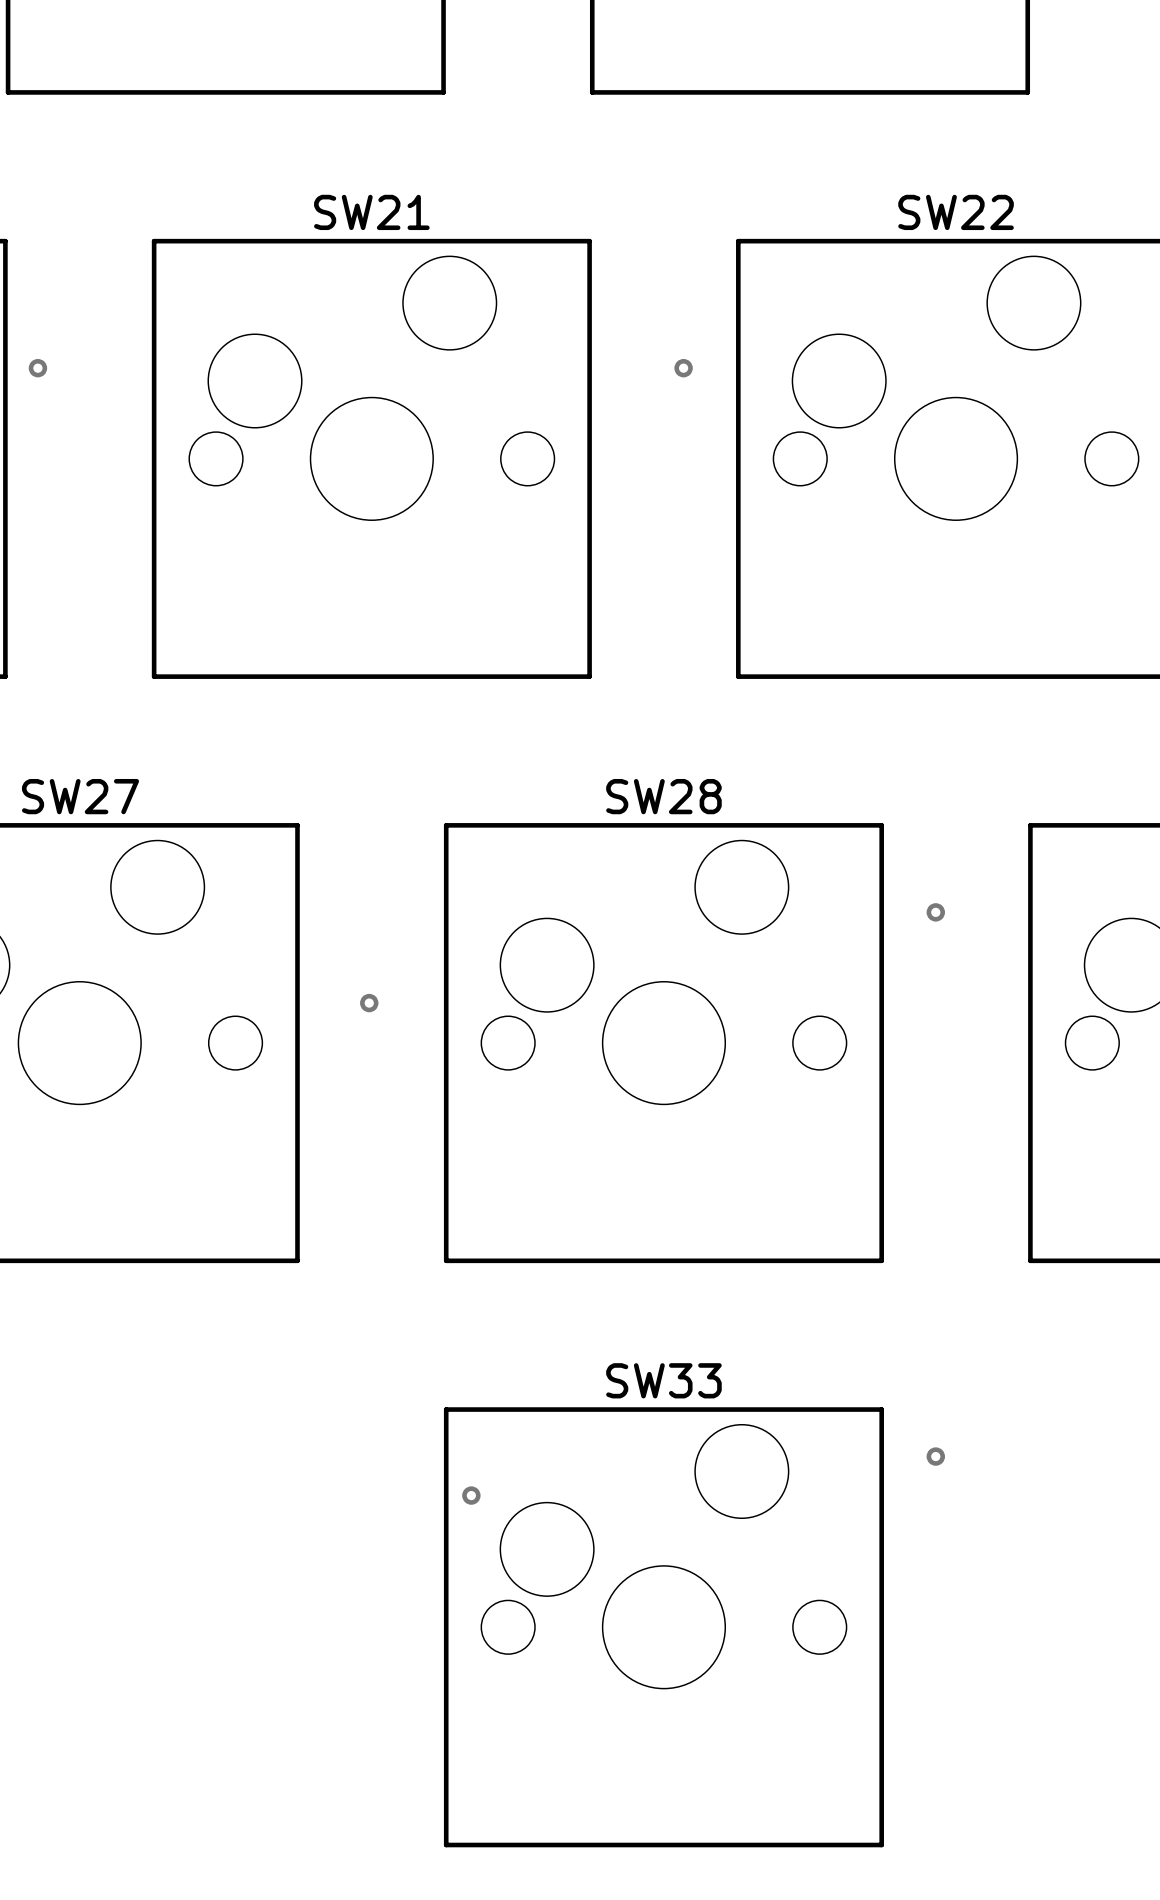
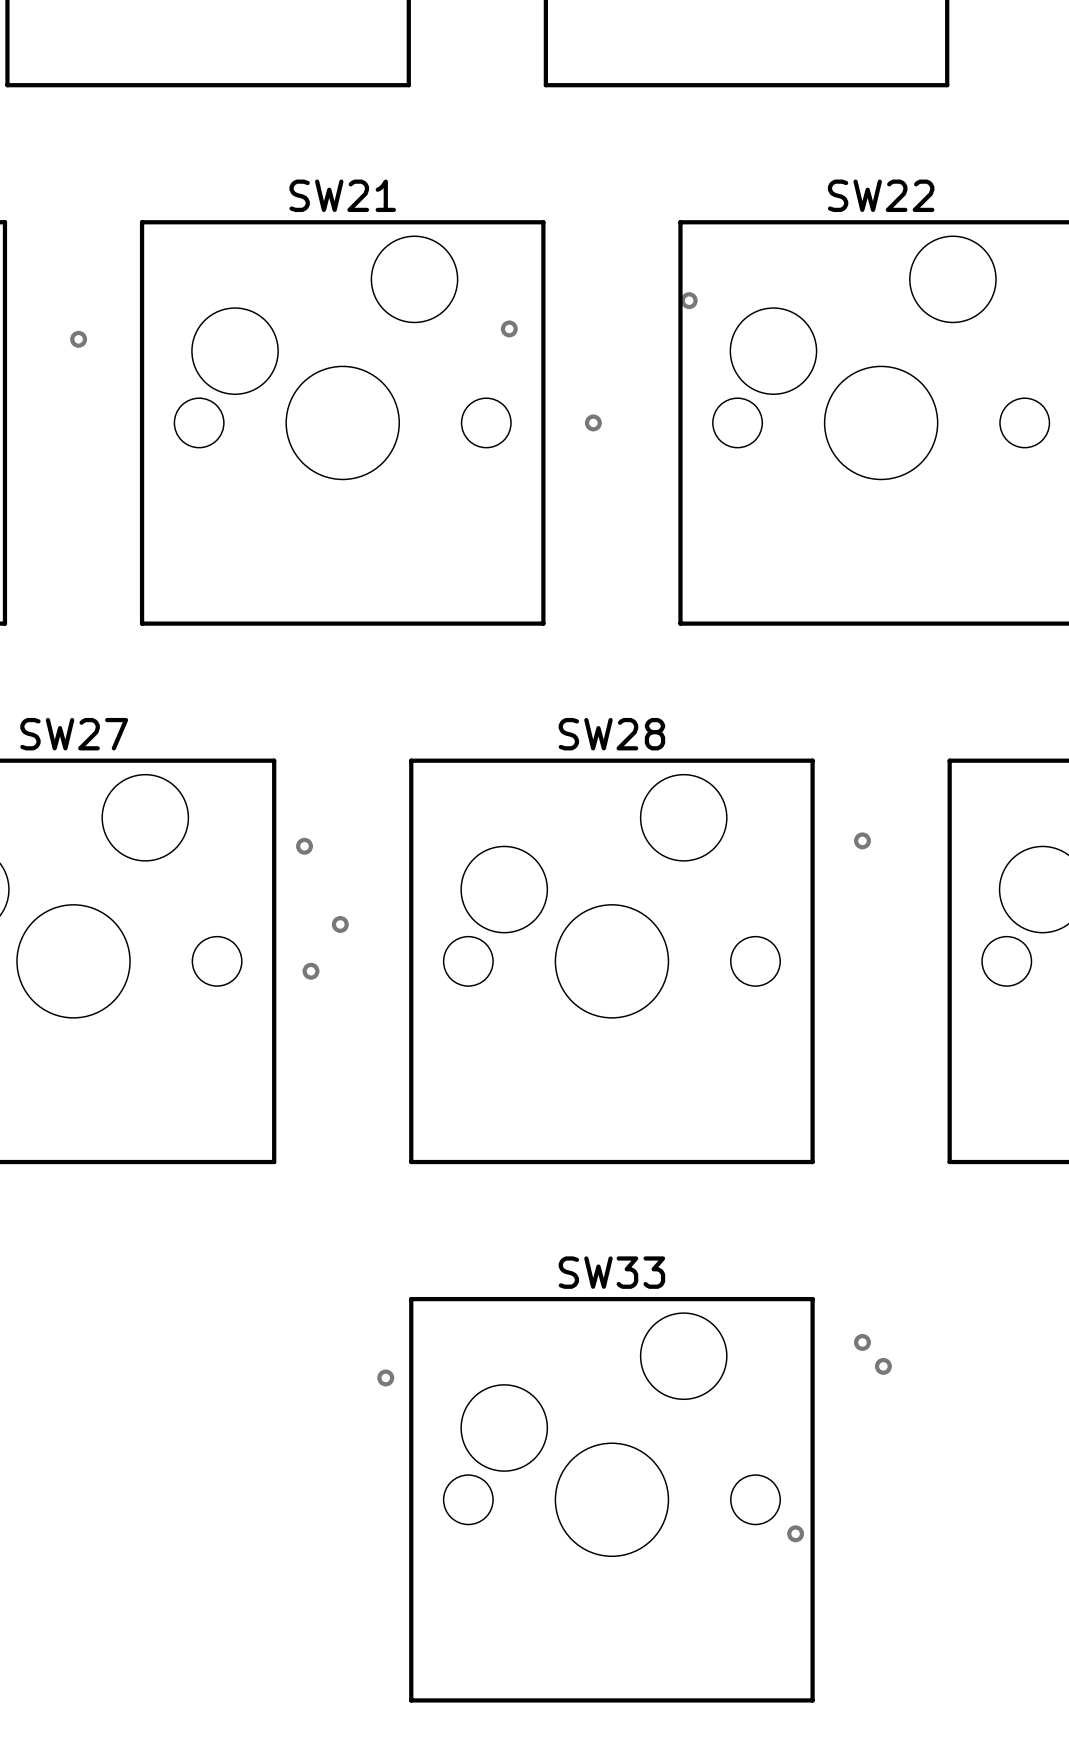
via: none -> (689, 300)
via: none -> (509, 328)
via position: (37, 368) -> (78, 339)
via: (683, 368) -> none
via: none -> (593, 422)
via: none -> (304, 846)
via: none -> (311, 971)
via: none -> (883, 1366)
via position: (471, 1495) -> (385, 1377)
via: none -> (795, 1533)

